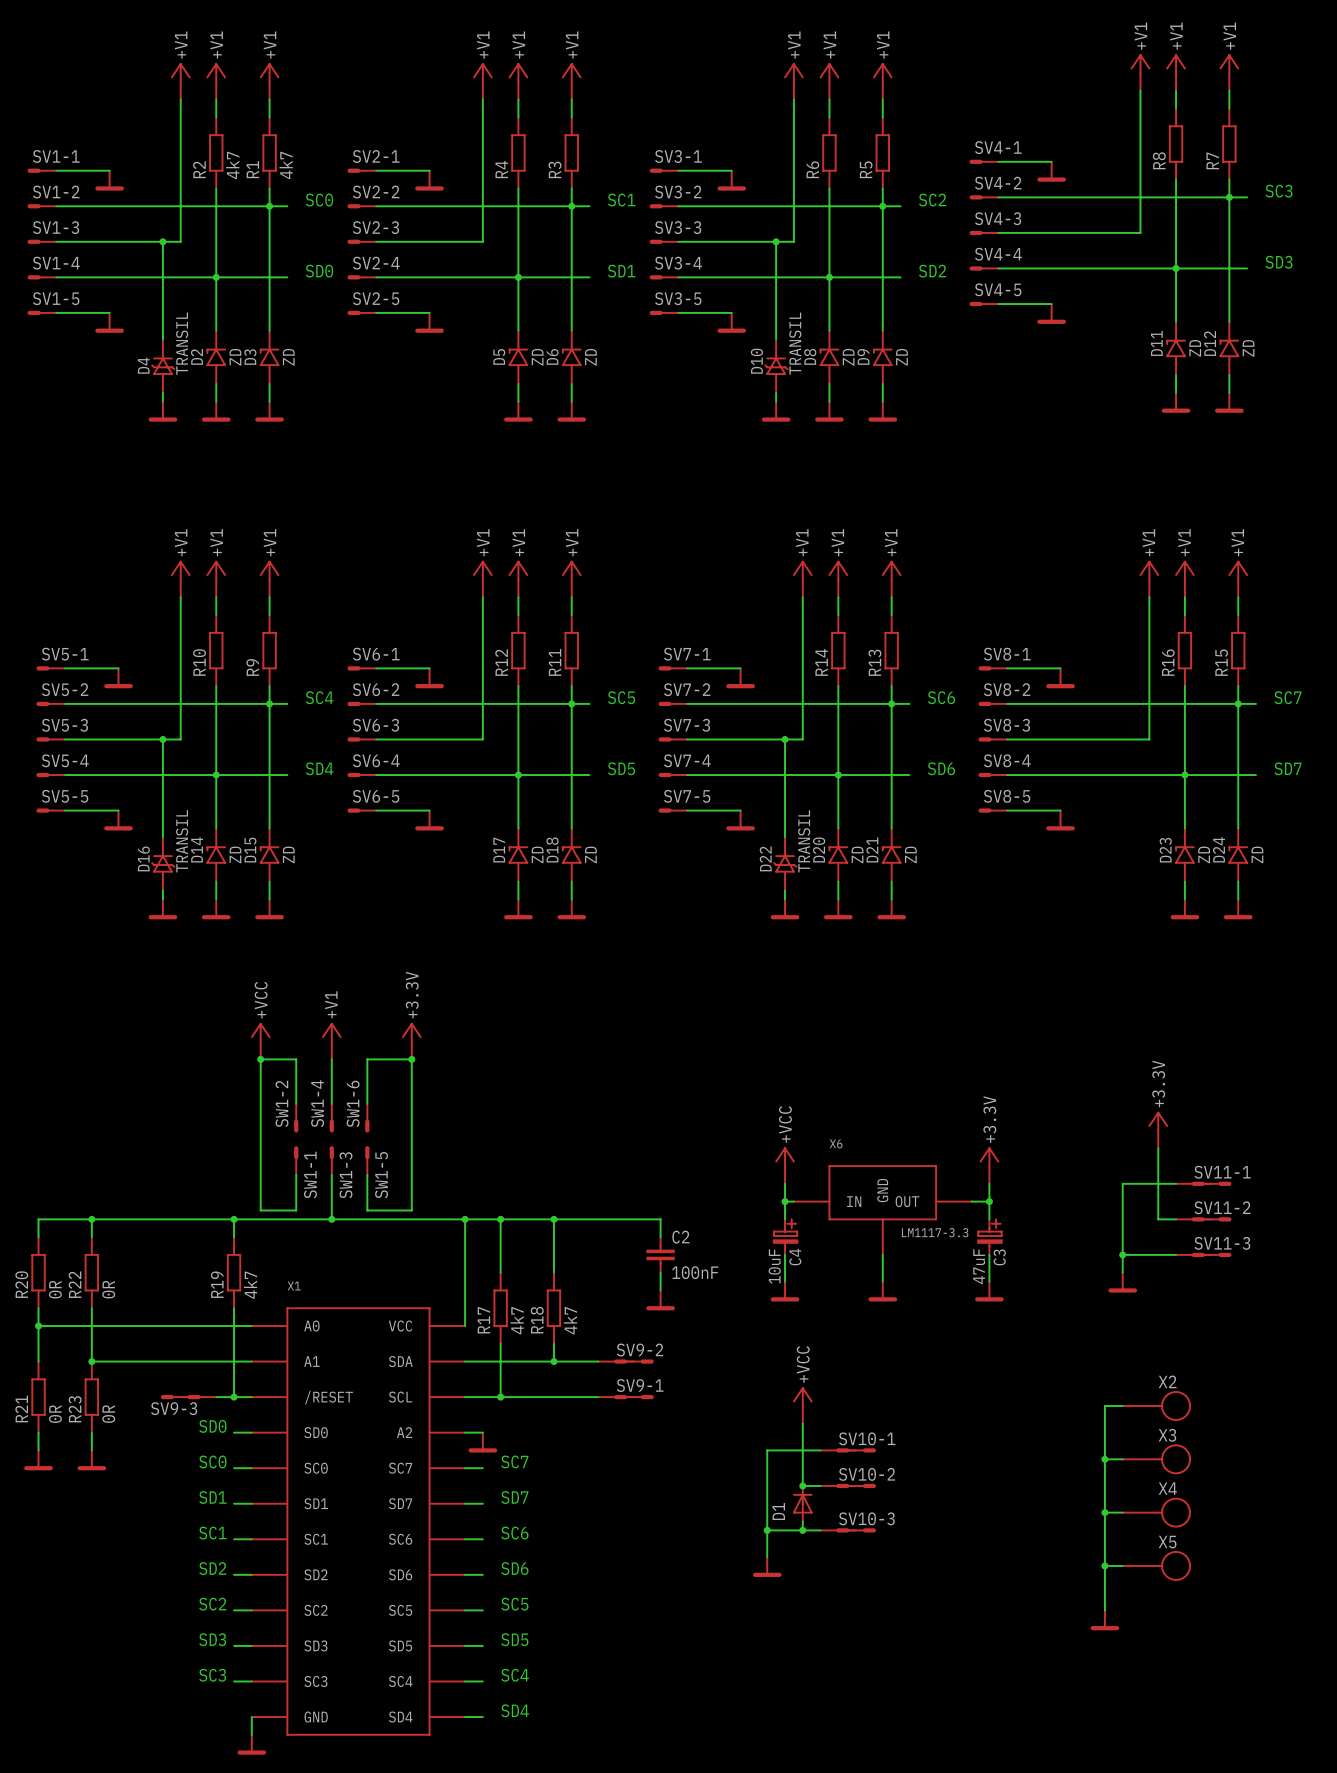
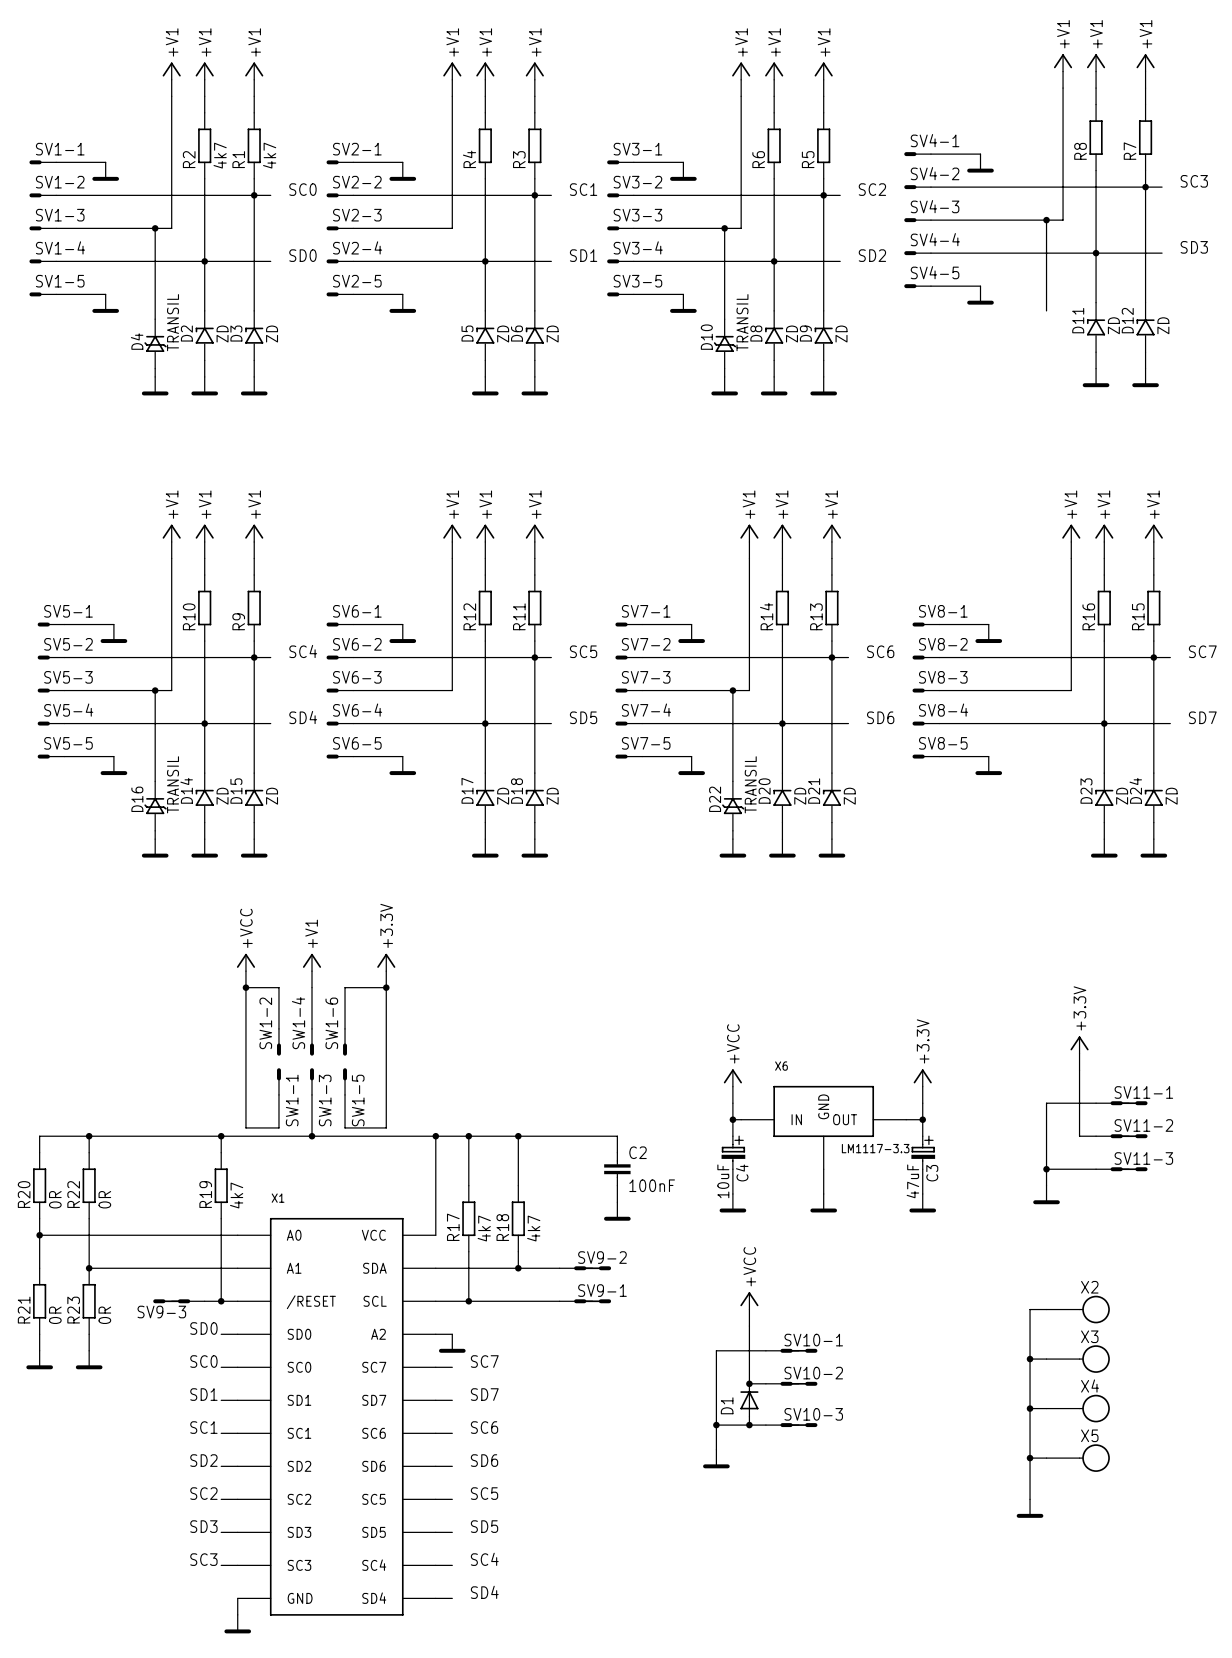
wire: none -> (1046, 220) (1046, 310)
junction: none -> (1046, 220)

